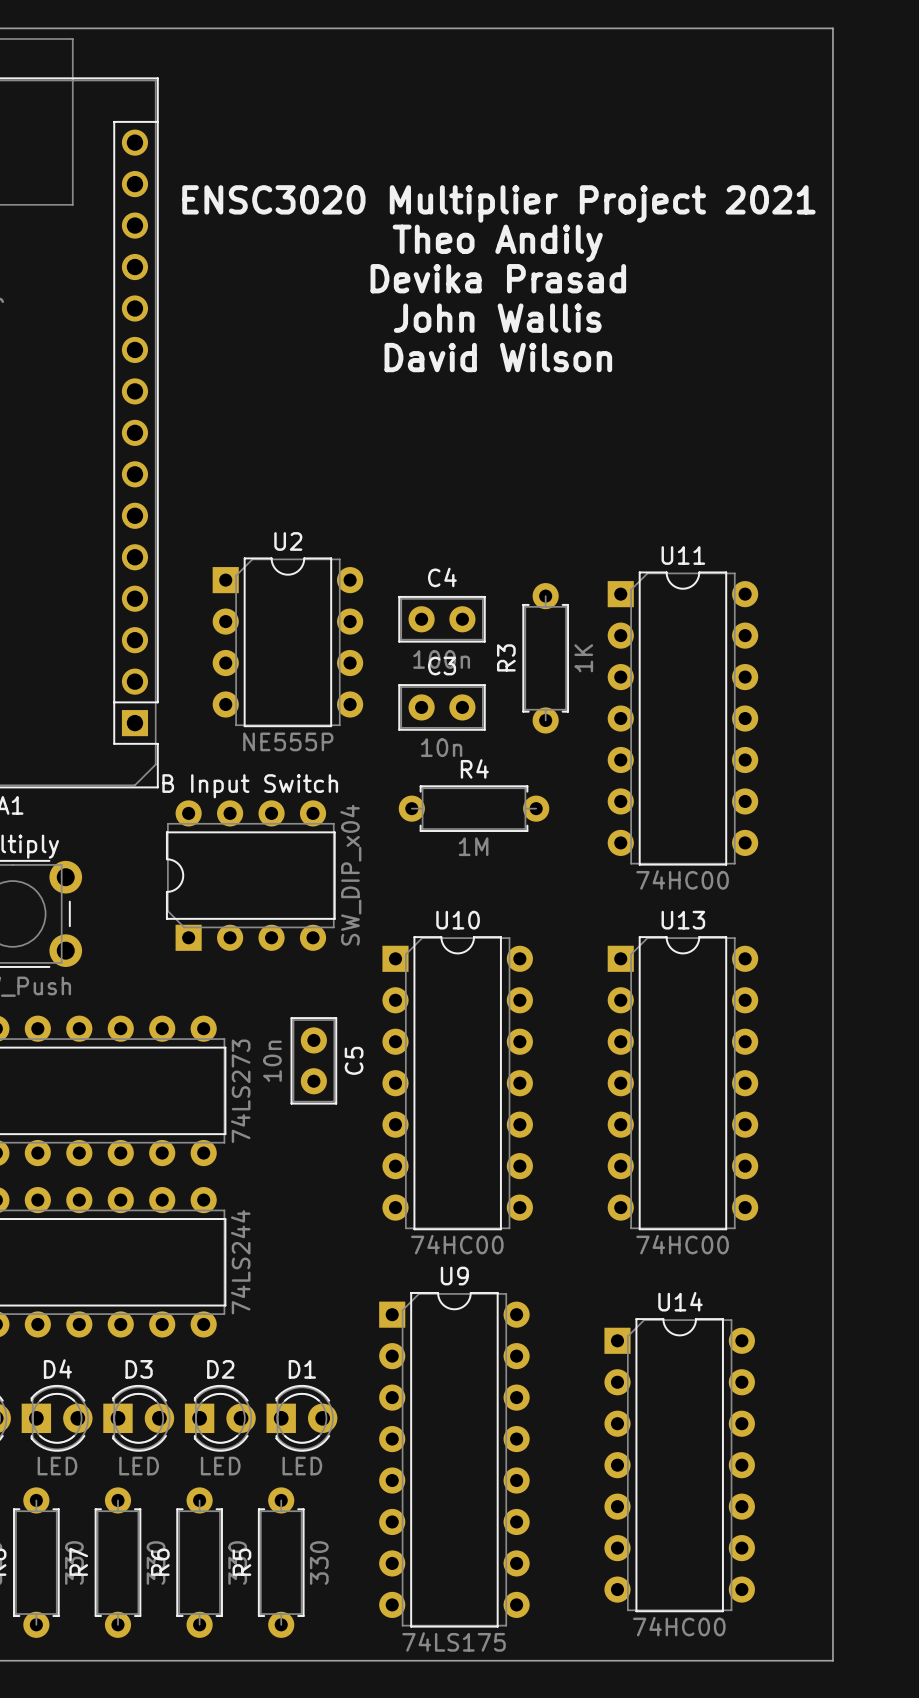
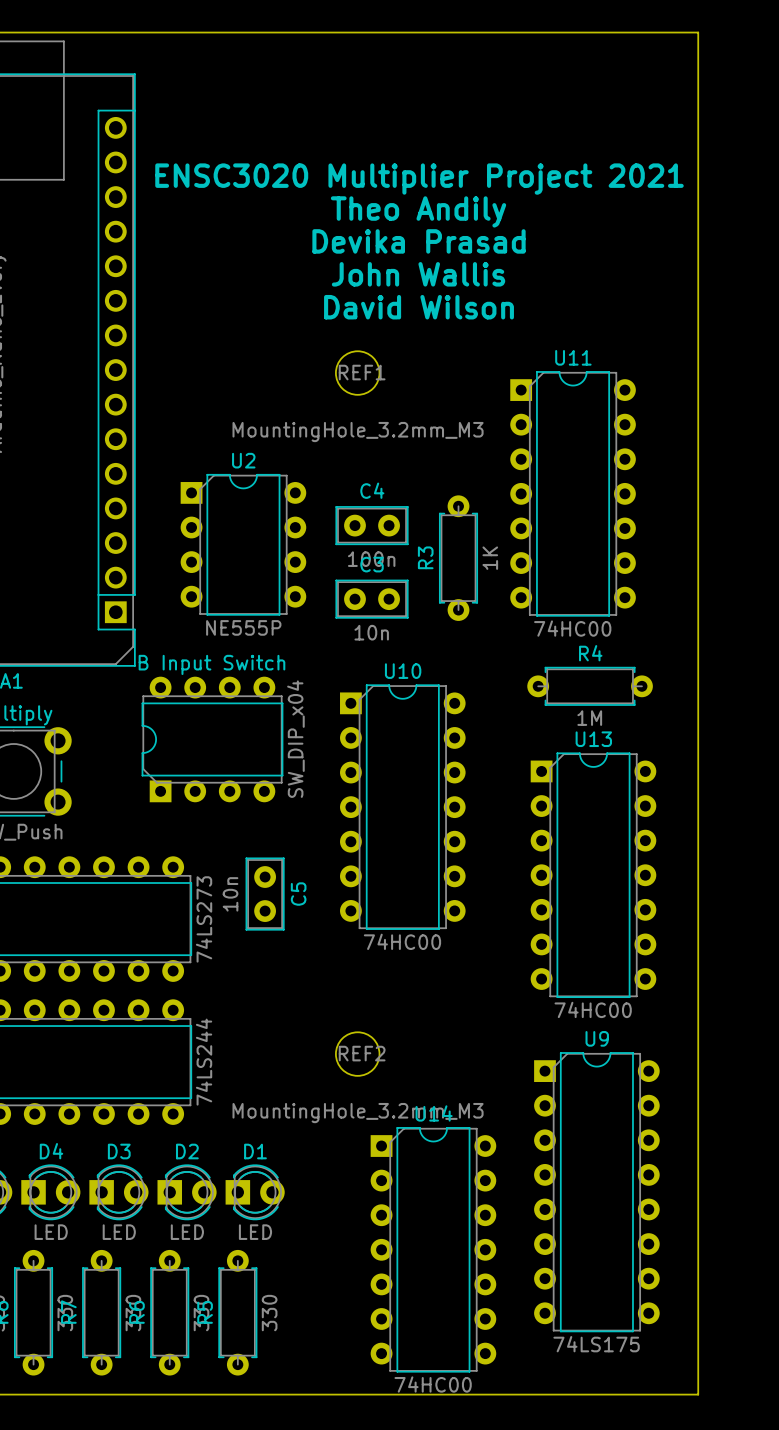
REF1: none -> MountingHole_3.2mm_M3 (357, 373)
U11 position: (682, 718) -> (573, 493)
R4 position: (474, 808) -> (590, 686)
U10 position: (457, 1083) -> (402, 807)
U13 position: (682, 1083) -> (593, 875)
REF2: none -> MountingHole_3.2mm_M3 (357, 1054)
U9 position: (454, 1459) -> (596, 1192)
U14 position: (679, 1465) -> (433, 1249)

